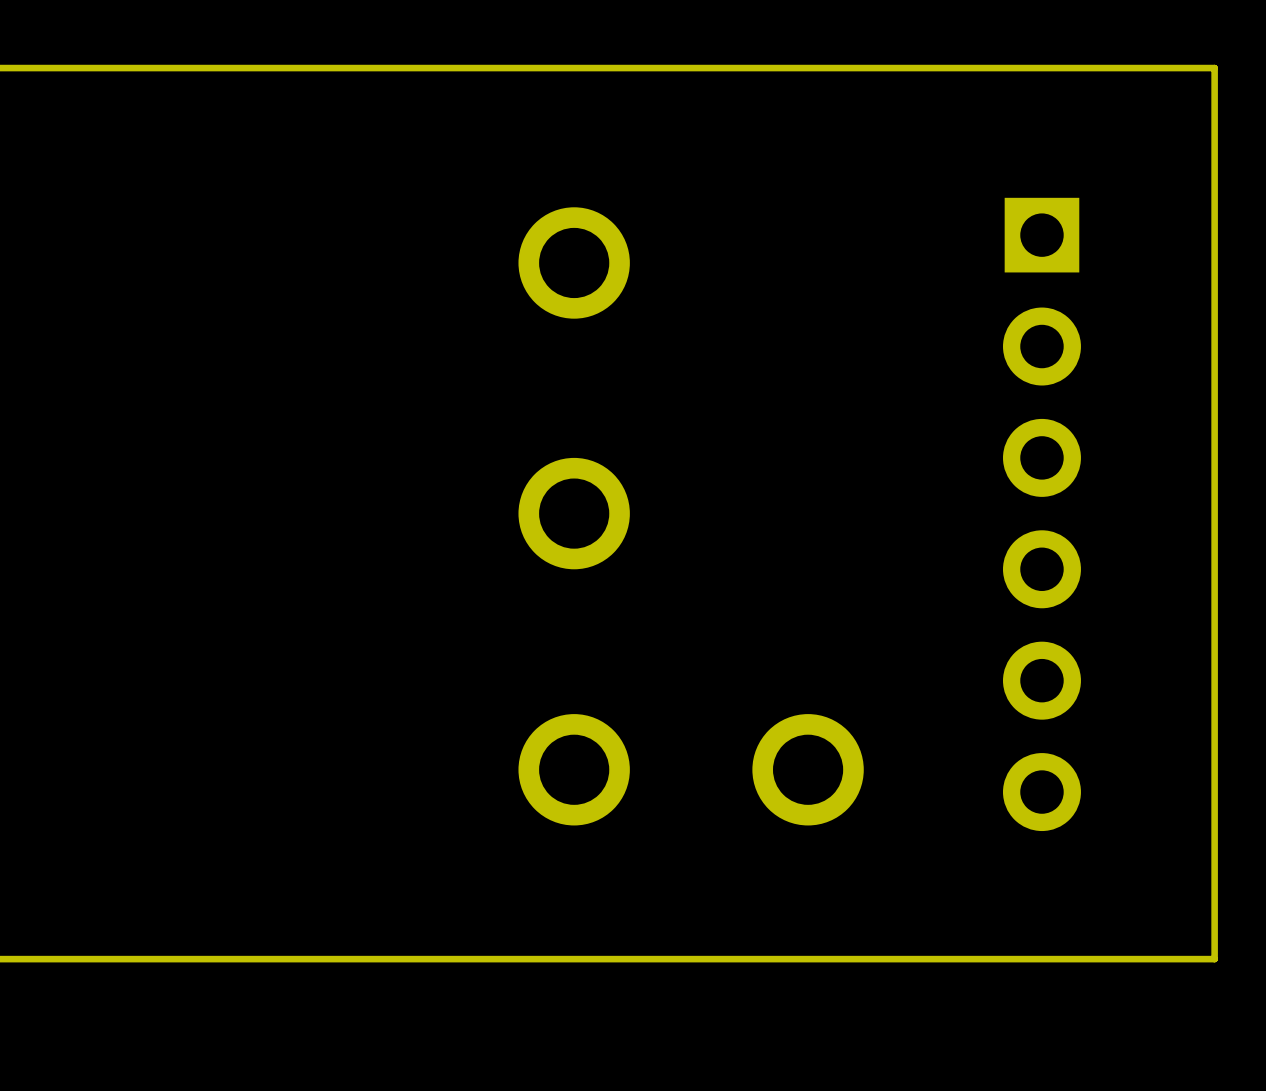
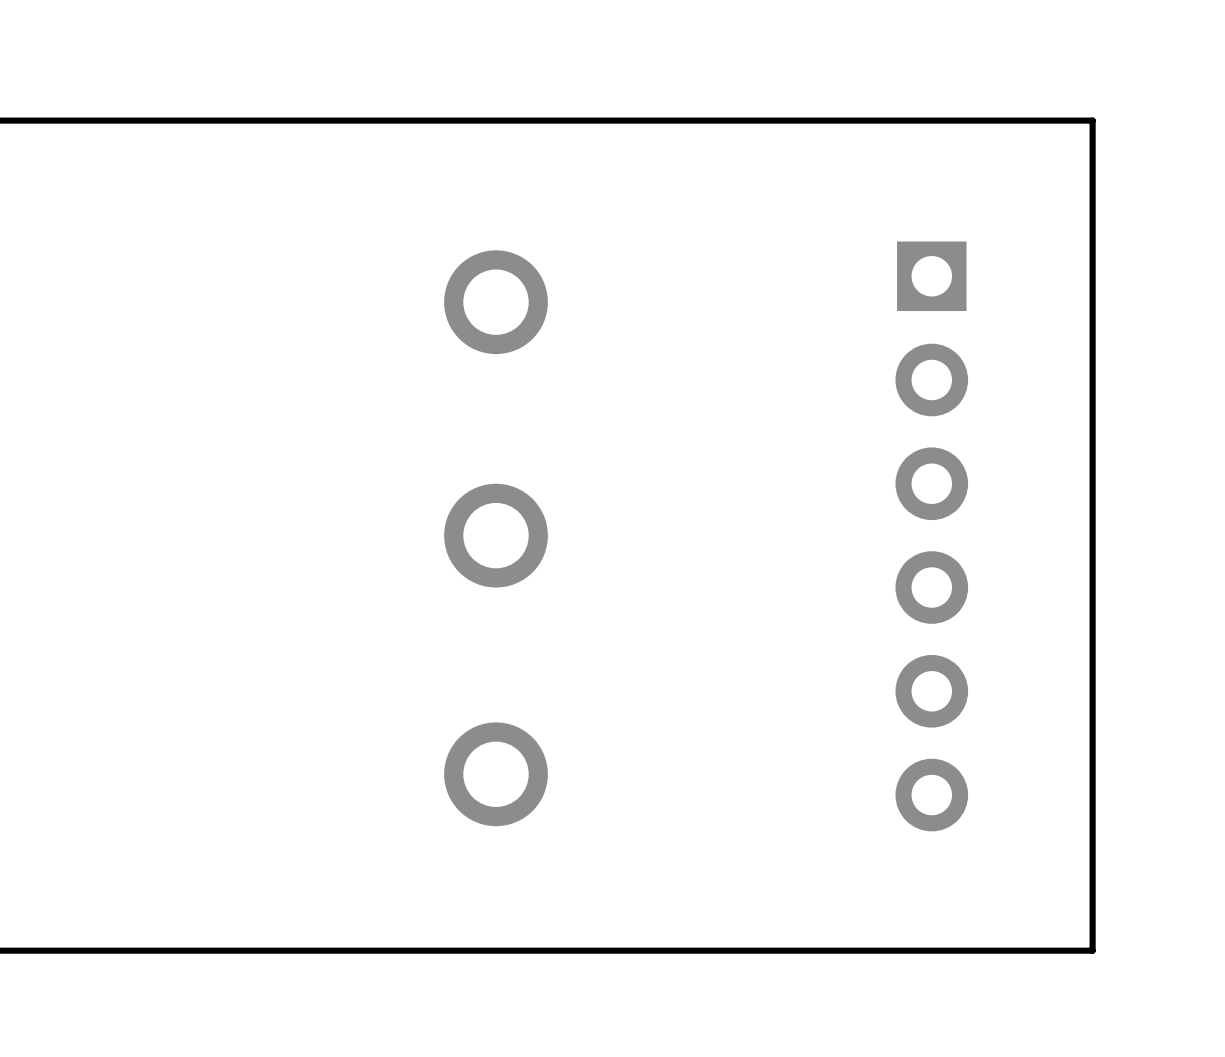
part: (808, 769) -> none

